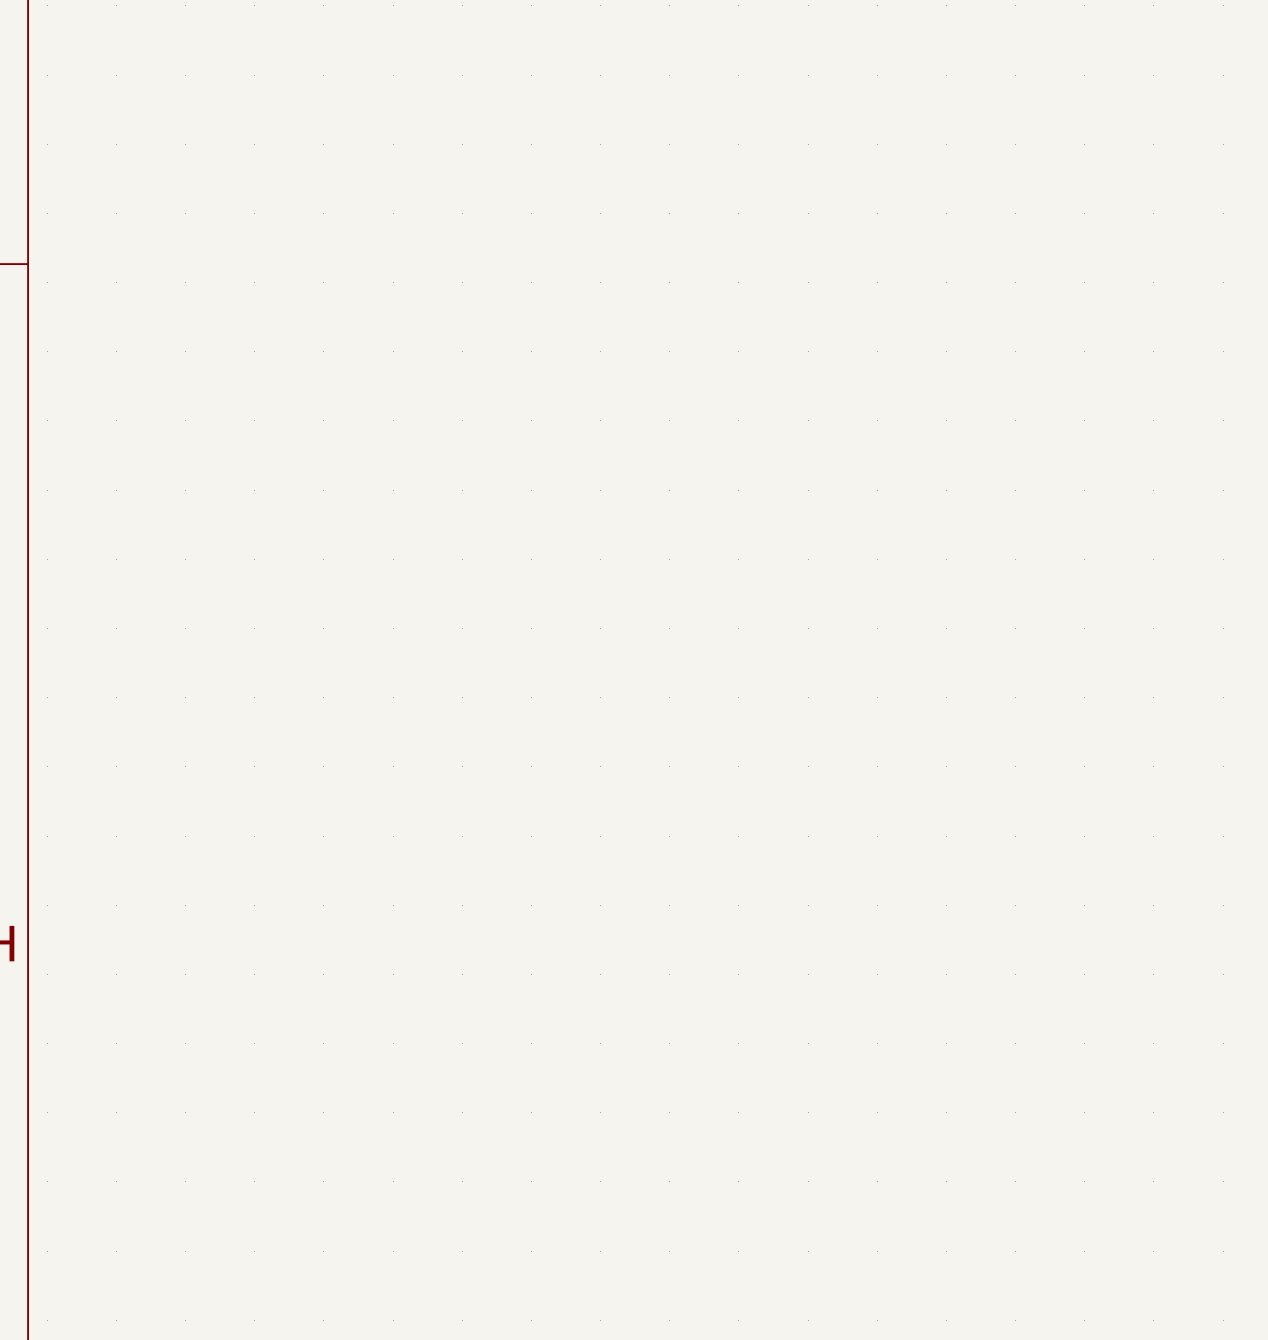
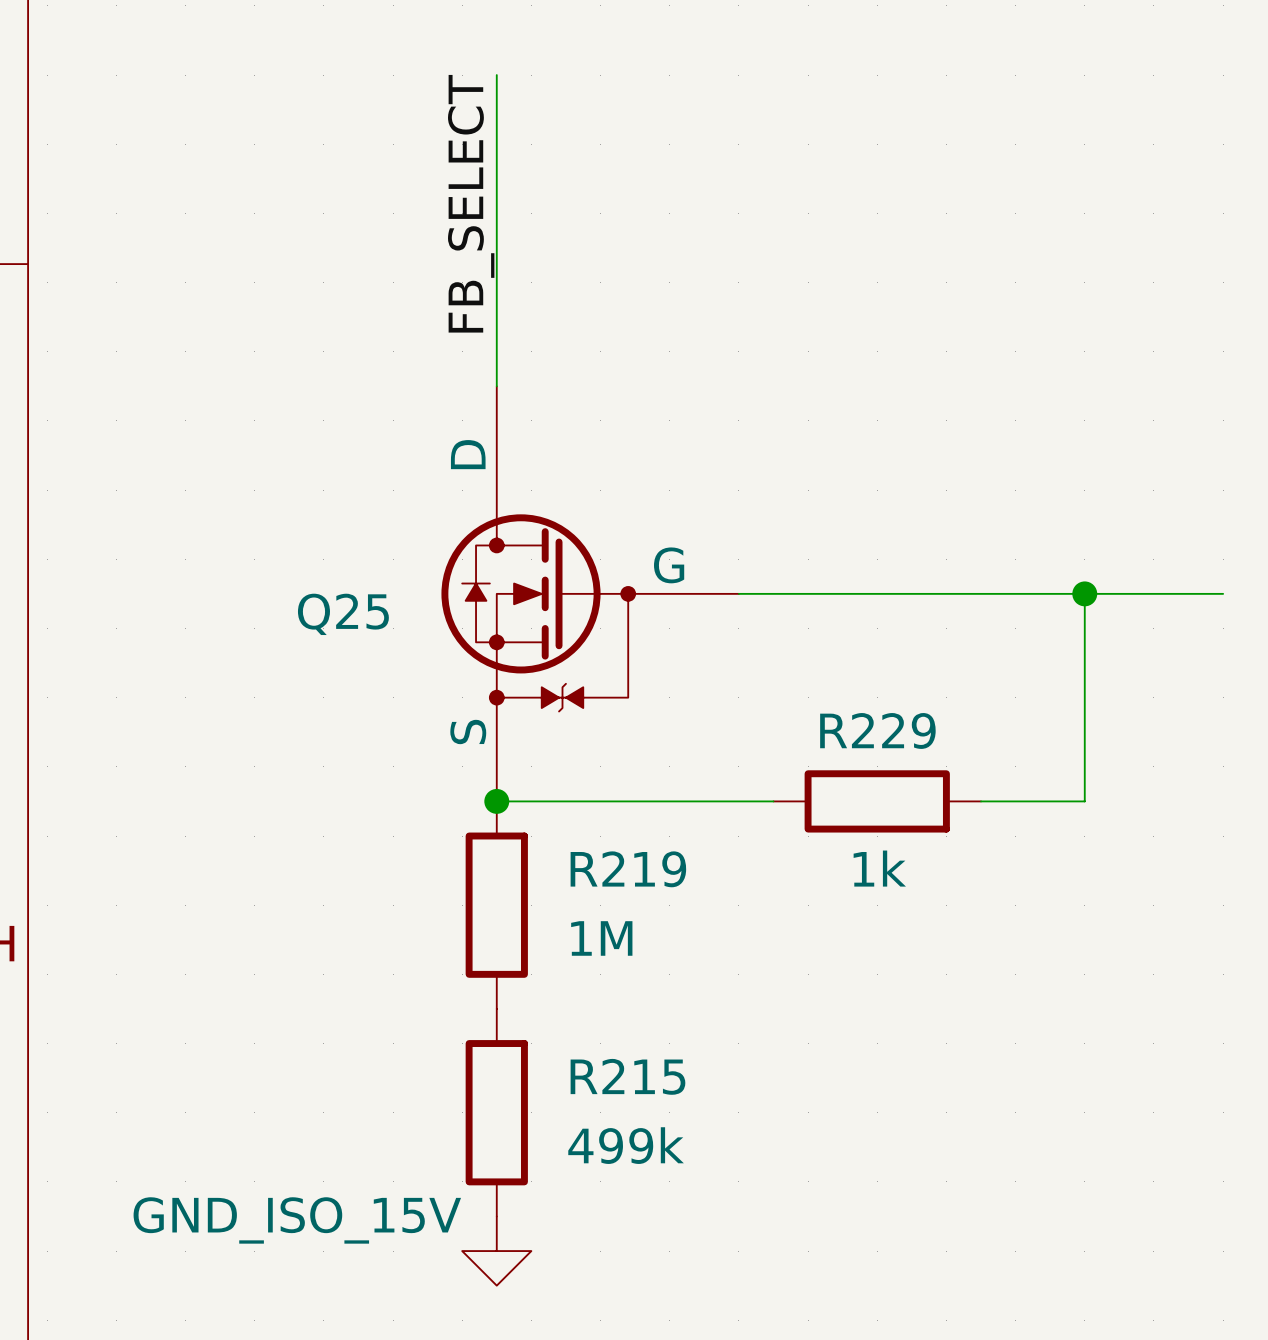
wire: none -> (496, 75) (496, 386)
label: none -> FB_SELECT (471, 203)
Q25: none -> (590, 593)
wire: none -> (738, 593) (1223, 593)
wire: none -> (1084, 593) (1084, 801) (981, 801)
junction: none -> (1084, 593)
wire: none -> (496, 801) (773, 801)
junction: none -> (496, 801)
R229: none -> (877, 801)
R219: none -> (496, 905)
R215: none -> (496, 1112)
power symbol: none -> GND_ISO_15V (496, 1251)

